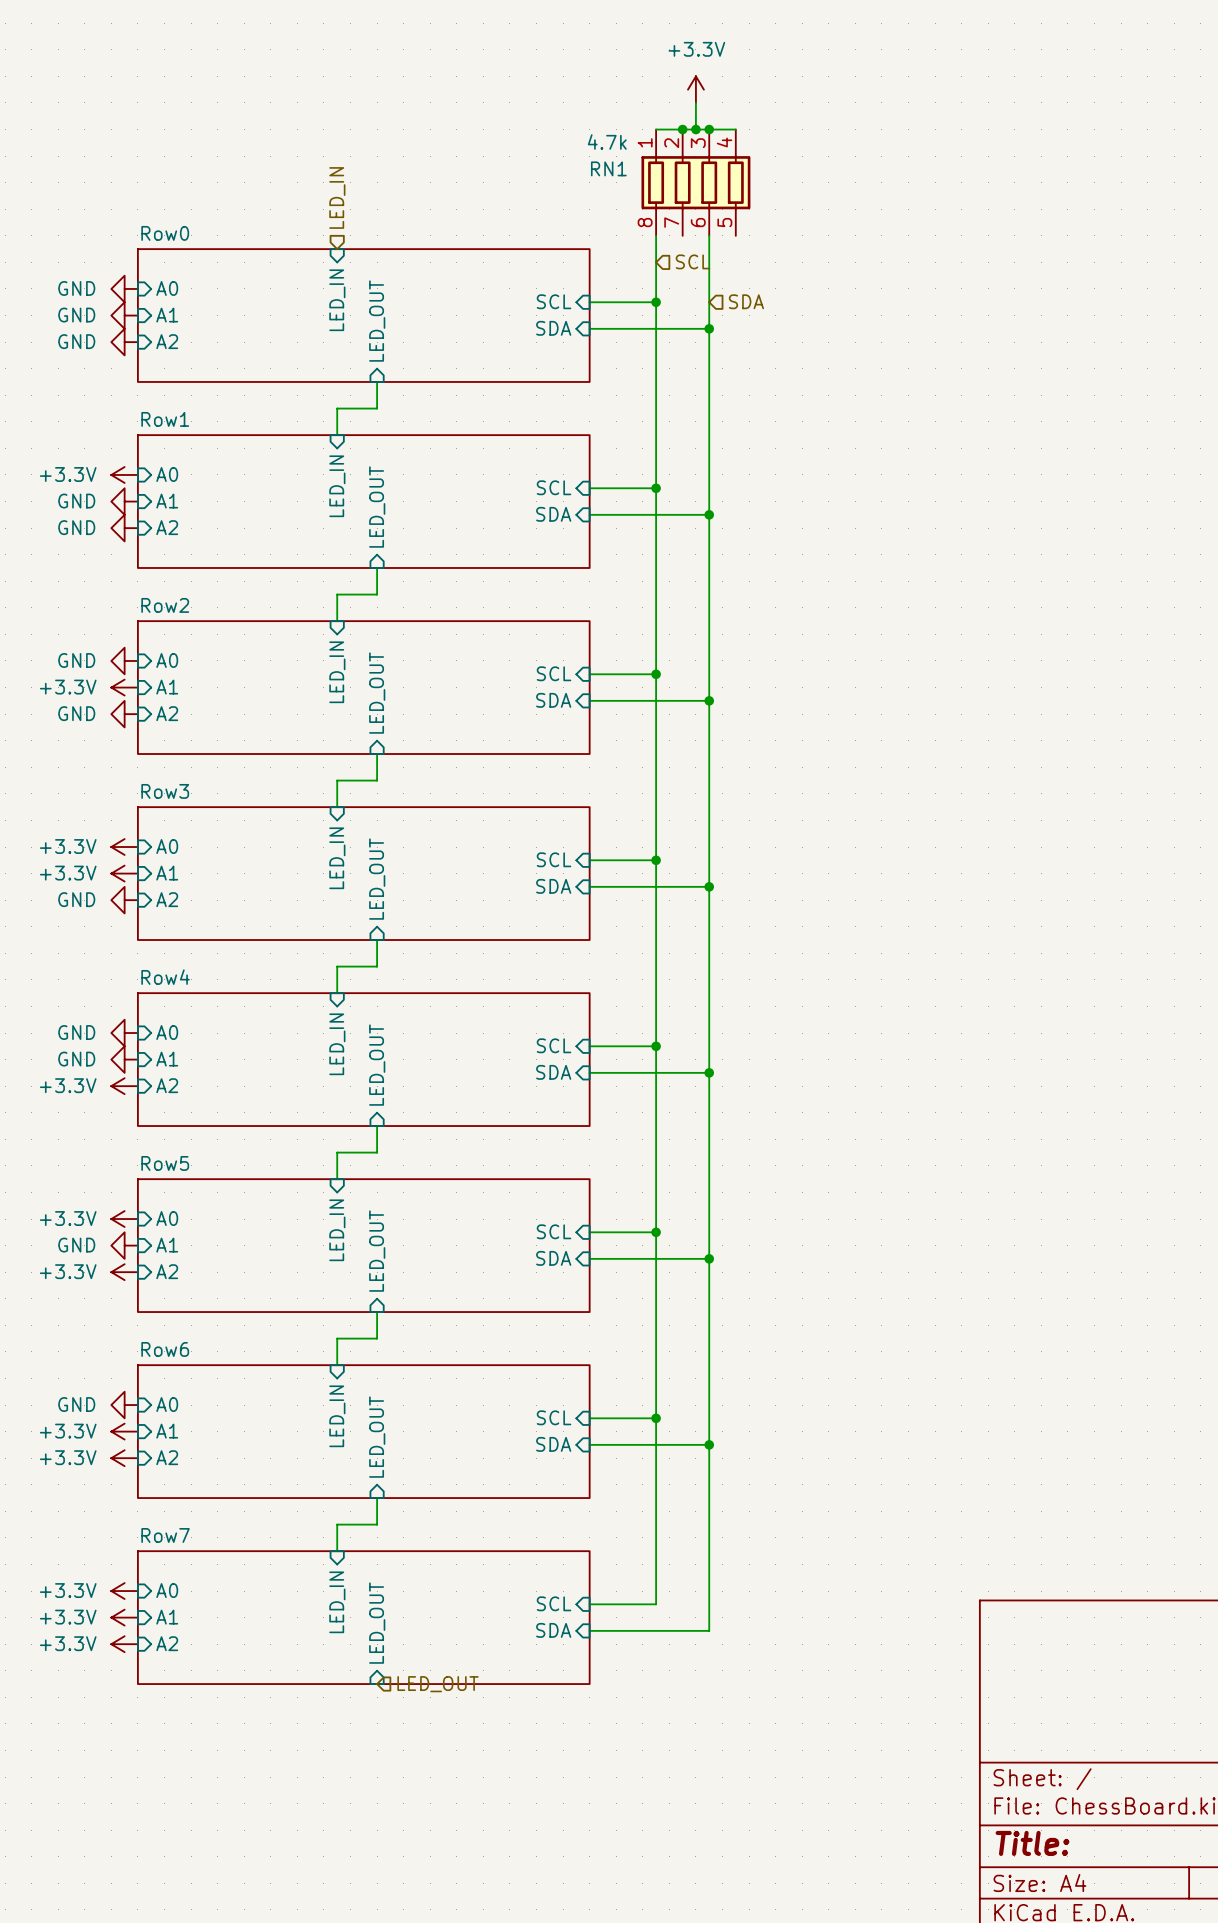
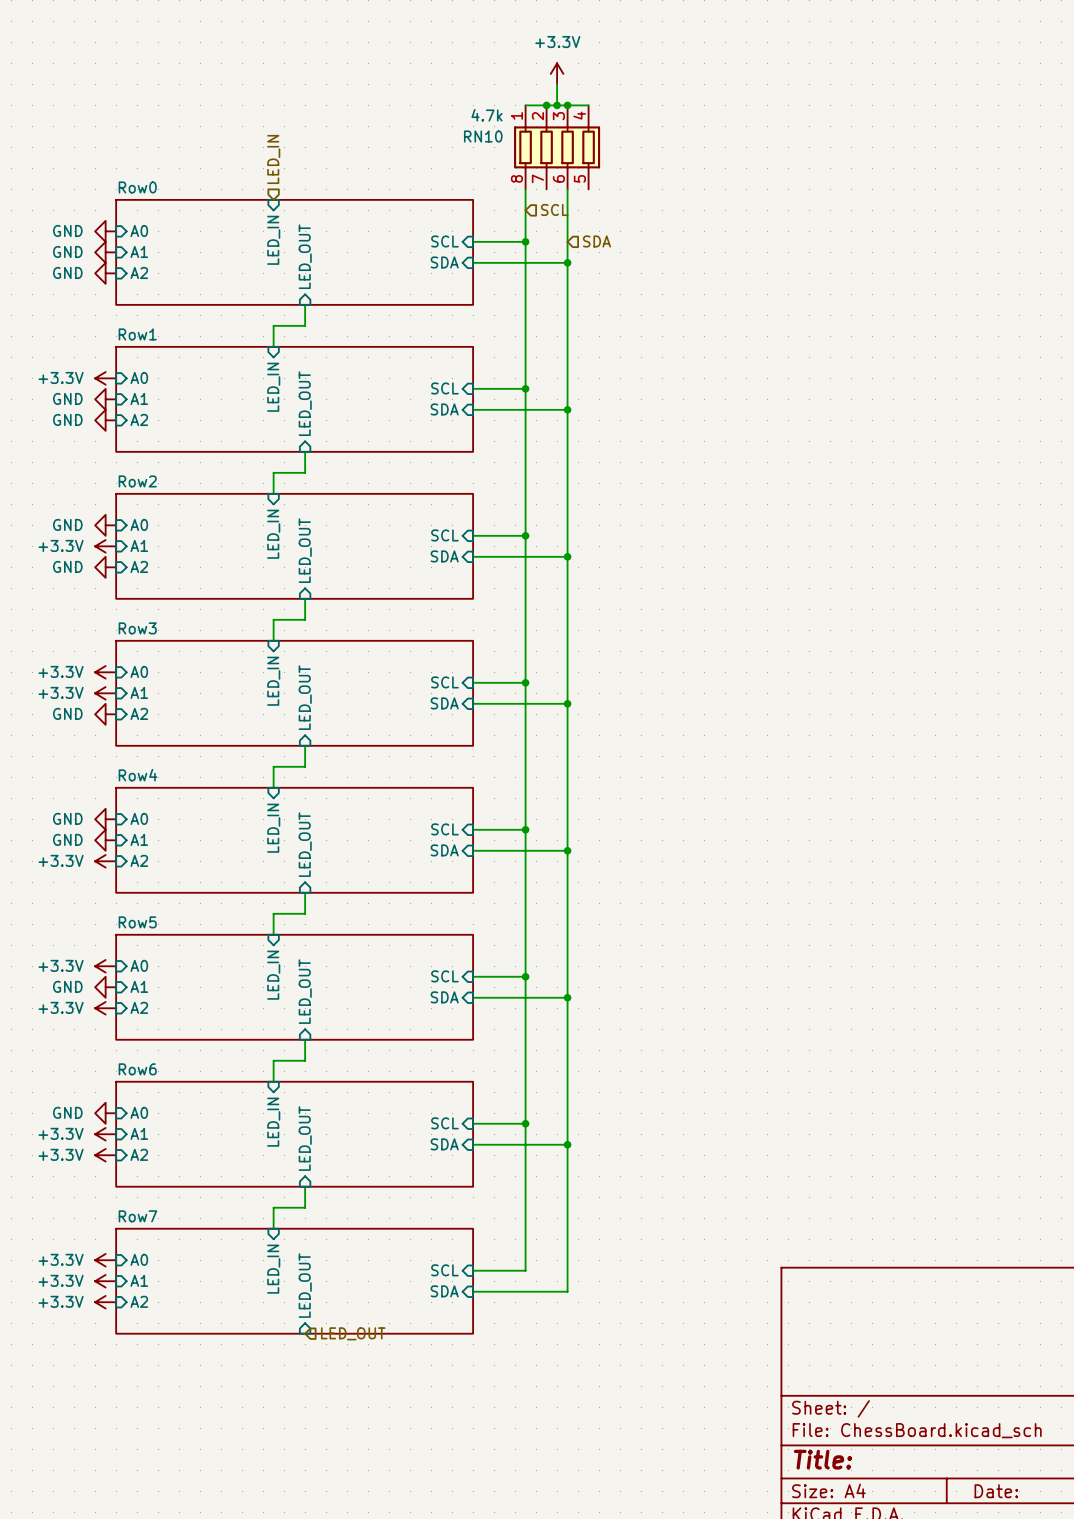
RN1 name: RN1 (608, 168) -> RN10 (483, 136)

